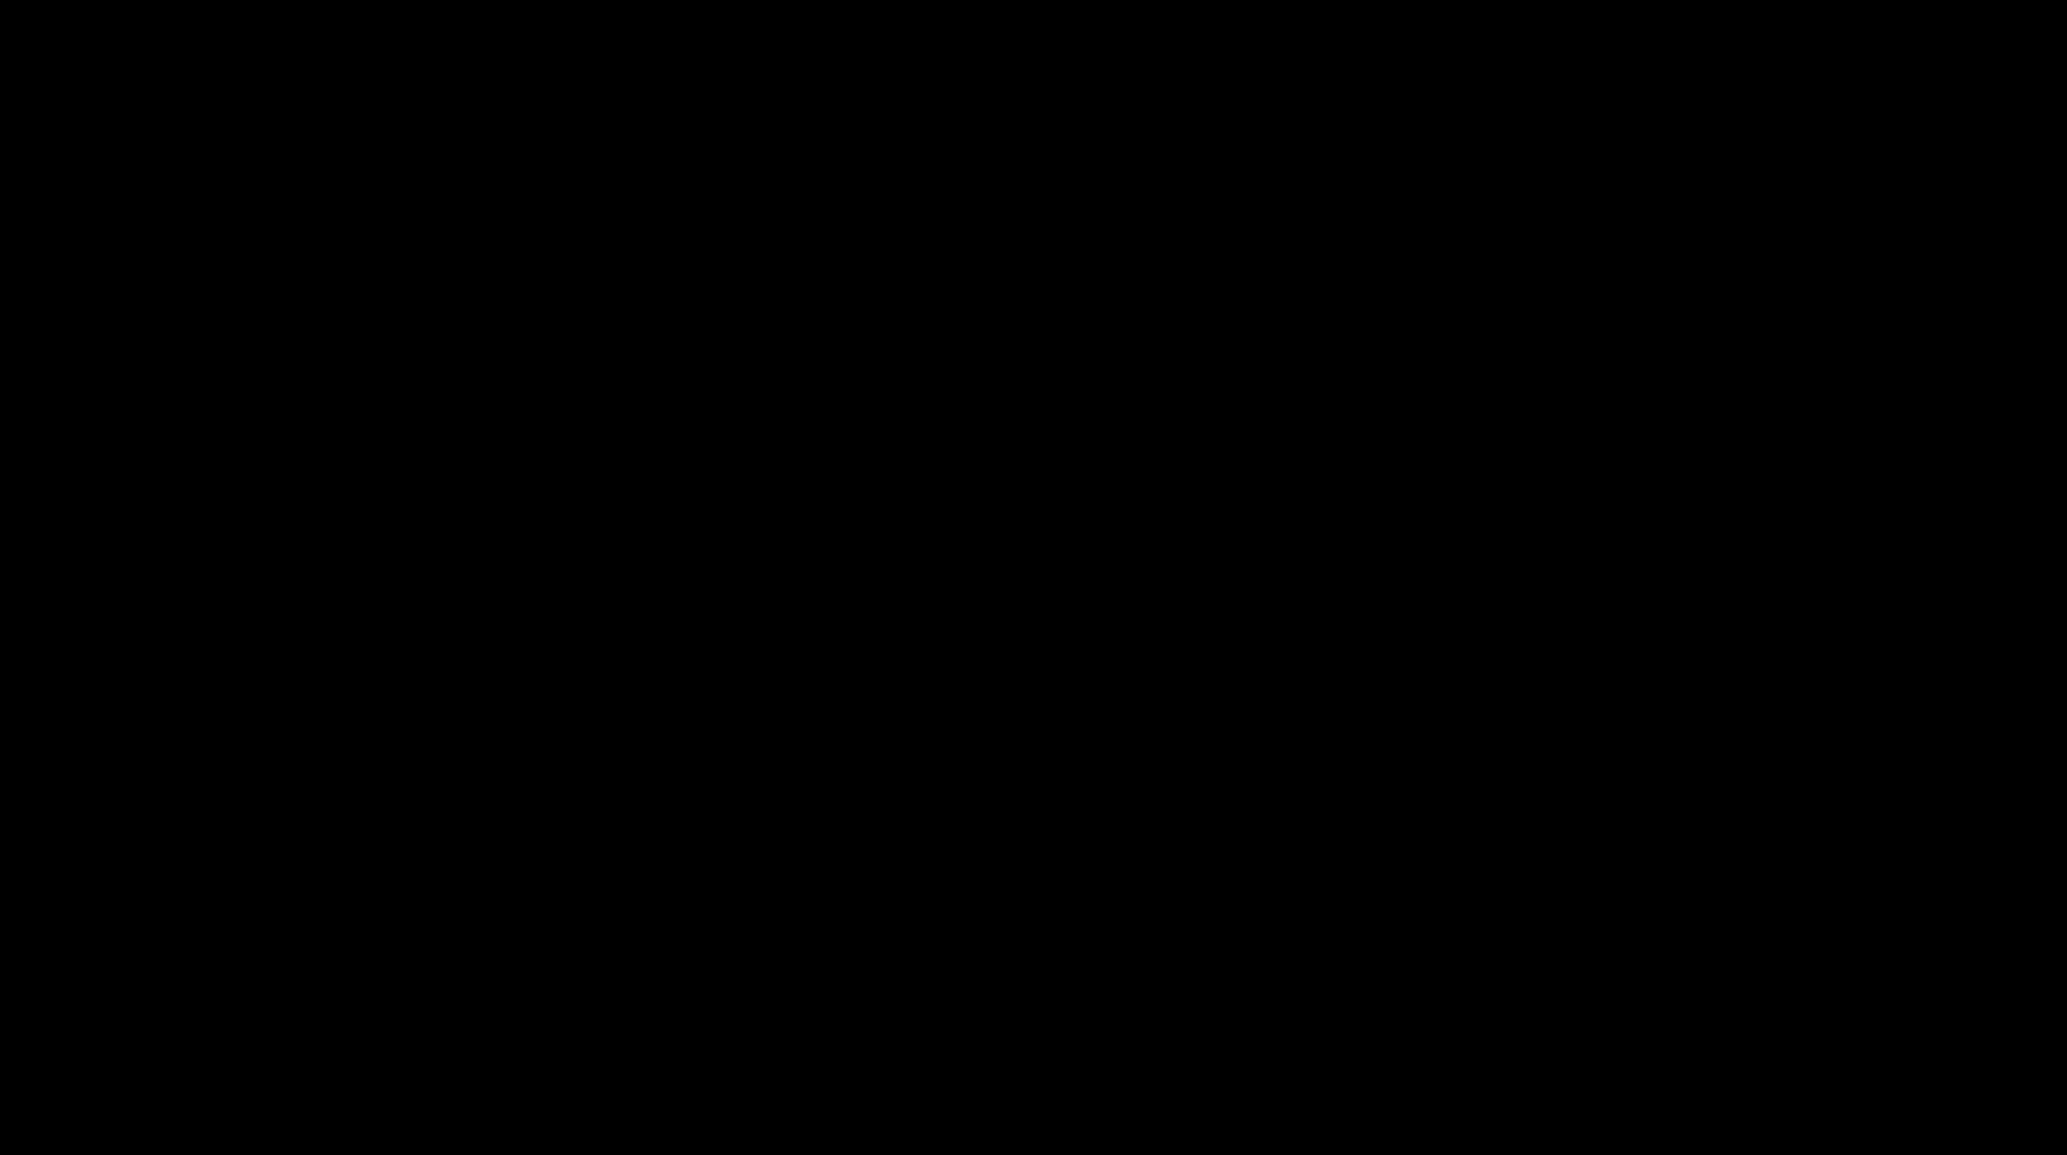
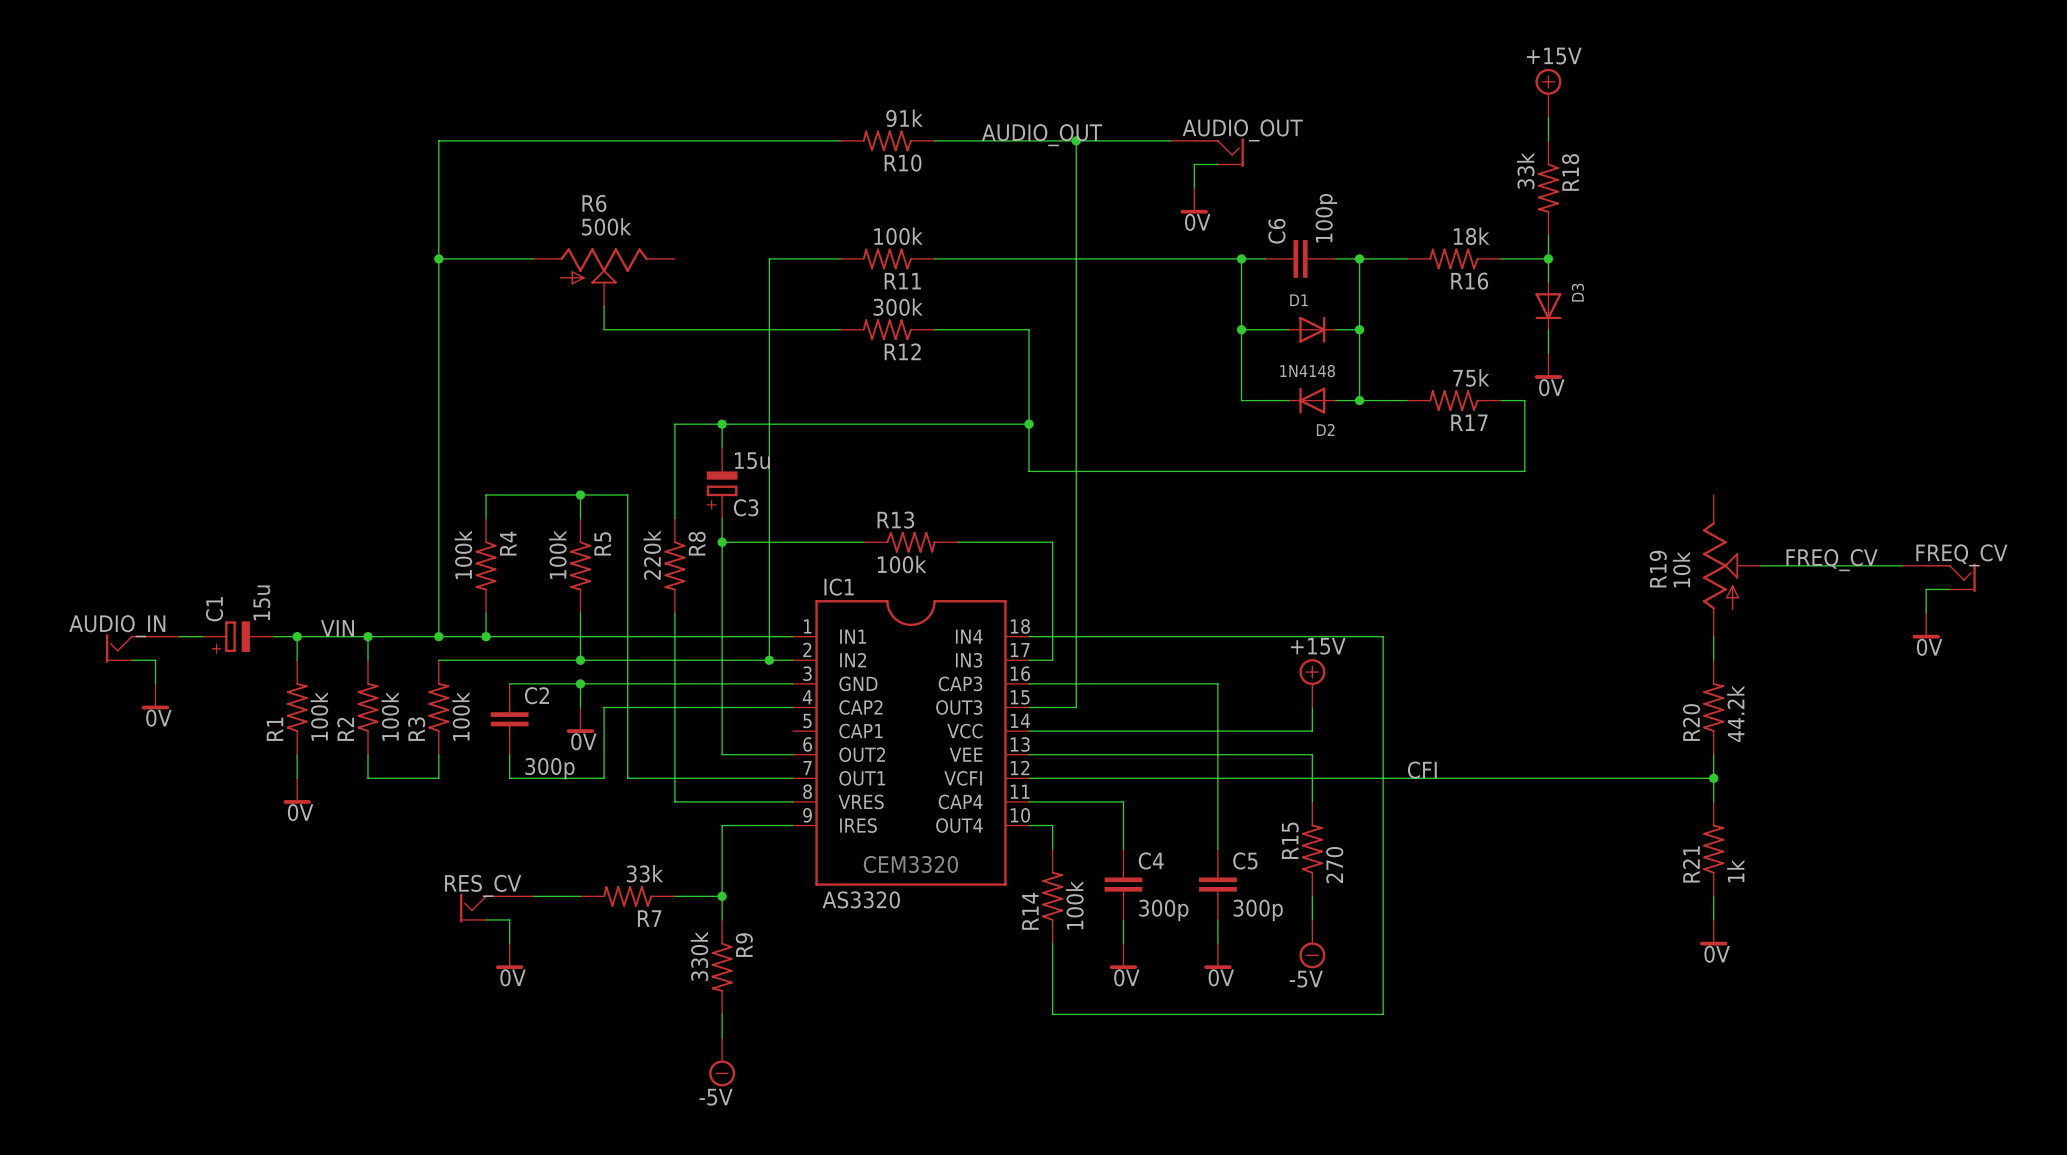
power symbol: none -> +15V (1548, 93)
wire: none -> (1548, 117) (1548, 140)
label: none -> AUDIO_OUT (1042, 135)
wire: none -> (840, 140) (438, 140) (438, 636)
R10: none -> 91k (887, 140)
wire: none -> (934, 140) (1170, 140)
wire: none -> (1076, 140) (1076, 707) (1029, 707)
junction: none -> (1076, 140)
AUDIO_OUT: none -> (1207, 152)
wire: none -> (1217, 164) (1194, 164) (1194, 188)
R18: none -> 33k (1548, 188)
power symbol: none -> 0V (1194, 200)
wire: none -> (1548, 235) (1548, 282)
wire: none -> (438, 258) (533, 258)
junction: none -> (438, 258)
wire: none -> (840, 258) (769, 258) (769, 660)
R11: none -> 100k (887, 258)
wire: none -> (934, 258) (1265, 258)
wire: none -> (1241, 258) (1241, 400) (1288, 400)
junction: none -> (1241, 258)
C6: none -> 100p (1300, 258)
wire: none -> (1335, 258) (1406, 258)
wire: none -> (1359, 258) (1359, 400)
junction: none -> (1359, 258)
R16: none -> 18k (1453, 258)
wire: none -> (1501, 258) (1548, 258)
junction: none -> (1548, 258)
R6: none -> 500k (604, 277)
wire: none -> (604, 306) (604, 329) (840, 329)
D3: none -> (1548, 306)
R12: none -> 300k (887, 329)
wire: none -> (934, 329) (1029, 329) (1029, 471) (1524, 471) (1524, 400) (1501, 400)
wire: none -> (1241, 329) (1288, 329)
junction: none -> (1241, 329)
D1: none -> (1312, 329)
wire: none -> (1335, 329) (1359, 329)
junction: none -> (1359, 329)
wire: none -> (1548, 329) (1548, 353)
power symbol: none -> 0V (1548, 366)
D2: none -> 1N4148 (1312, 400)
wire: none -> (1335, 400) (1406, 400)
junction: none -> (1359, 400)
R17: none -> 75k (1453, 400)
wire: none -> (722, 424) (722, 447)
junction: none -> (722, 424)
wire: none -> (1029, 424) (674, 424) (674, 518)
junction: none -> (1029, 424)
C3: none -> 15u (722, 483)
wire: none -> (580, 495) (580, 518)
junction: none -> (580, 495)
wire: none -> (486, 518) (486, 495) (627, 495) (627, 778) (792, 778)
wire: none -> (722, 518) (722, 754) (792, 754)
wire: none -> (722, 542) (863, 542)
junction: none -> (722, 542)
R13: none -> 100k (910, 542)
wire: none -> (958, 542) (1052, 542) (1052, 660) (1029, 660)
label: none -> FREQ_CV (1832, 560)
R4: none -> 100k (486, 565)
R5: none -> 100k (580, 565)
R8: none -> 220k (674, 565)
R19: none -> 10k (1731, 565)
wire: none -> (1760, 565) (1902, 565)
FREQ_CV: none -> (1939, 577)
wire: none -> (1949, 589) (1926, 589) (1926, 613)
wire: none -> (486, 613) (486, 636)
wire: none -> (580, 613) (580, 660)
wire: none -> (674, 613) (674, 801) (792, 801)
power symbol: none -> 0V (1926, 625)
label: none -> VIN (337, 628)
wire: none -> (179, 636) (202, 636)
C1: none -> 15u (238, 636)
wire: none -> (273, 636) (792, 636)
wire: none -> (297, 636) (297, 660)
junction: none -> (297, 636)
wire: none -> (367, 636) (367, 660)
junction: none -> (367, 636)
junction: none -> (438, 636)
junction: none -> (486, 636)
wire: none -> (1029, 636) (1383, 636) (1383, 1014) (1052, 1014) (1052, 943)
wire: none -> (1713, 636) (1713, 660)
AUDIO_IN: none -> (142, 648)
wire: none -> (131, 660) (155, 660) (155, 683)
wire: none -> (438, 660) (792, 660)
junction: none -> (580, 660)
junction: none -> (769, 660)
wire: none -> (509, 683) (792, 683)
wire: none -> (580, 683) (580, 707)
junction: none -> (580, 683)
wire: none -> (1029, 683) (1217, 683) (1217, 849)
power symbol: none -> +15V (1312, 683)
power symbol: none -> 0V (155, 696)
R1: none -> 100k (297, 707)
R2: none -> 100k (367, 707)
R3: none -> 100k (438, 707)
wire: none -> (792, 707) (604, 707) (604, 778) (509, 778) (509, 754)
wire: none -> (1312, 707) (1312, 731) (1029, 731)
R20: none -> 44.2k (1713, 707)
C2: none -> 300p (509, 719)
power symbol: none -> 0V (580, 720)
IC1: none -> AS3320 (910, 742)
wire: none -> (297, 754) (297, 778)
wire: none -> (367, 754) (367, 778) (438, 778) (438, 754)
wire: none -> (1029, 754) (1312, 754) (1312, 801)
wire: none -> (1713, 754) (1713, 801)
label: none -> CFI (1422, 770)
wire: none -> (1029, 778) (1713, 778)
junction: none -> (1713, 778)
power symbol: none -> 0V (297, 791)
wire: none -> (1029, 801) (1123, 801) (1123, 849)
wire: none -> (792, 825) (722, 825) (722, 919)
wire: none -> (1029, 825) (1052, 825) (1052, 849)
R15: none -> 270 (1312, 849)
R21: none -> 1k (1713, 849)
C4: none -> 300p (1123, 884)
C5: none -> 300p (1217, 884)
wire: none -> (533, 896) (580, 896)
R7: none -> 33k (627, 896)
wire: none -> (674, 896) (722, 896)
junction: none -> (722, 896)
R14: none -> 100k (1052, 896)
wire: none -> (1312, 896) (1312, 919)
wire: none -> (1713, 896) (1713, 919)
RES_CV: none -> (496, 908)
wire: none -> (486, 919) (509, 919) (509, 943)
wire: none -> (1123, 919) (1123, 943)
wire: none -> (1217, 919) (1217, 943)
power symbol: none -> 0V (1713, 932)
power symbol: none -> -5V (1312, 944)
power symbol: none -> 0V (509, 956)
power symbol: none -> 0V (1123, 956)
power symbol: none -> 0V (1217, 956)
R9: none -> 330k (722, 967)
wire: none -> (722, 1014) (722, 1038)
power symbol: none -> -5V (722, 1062)

